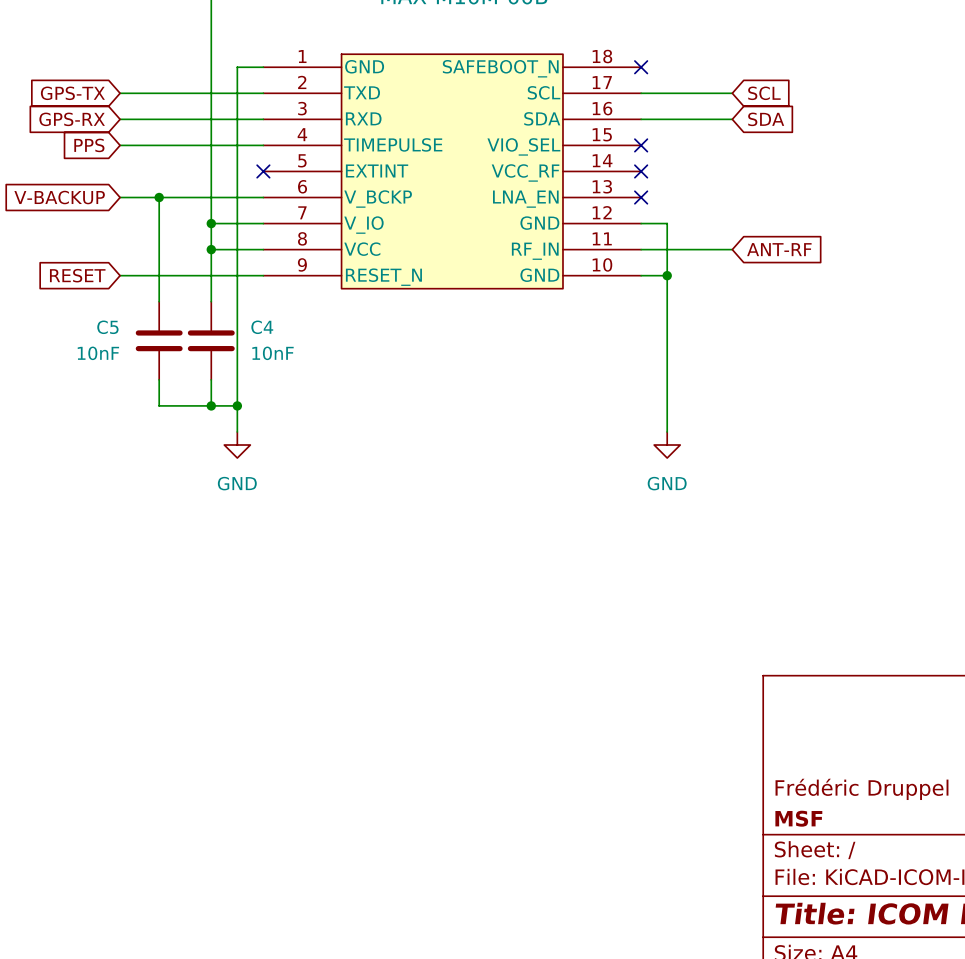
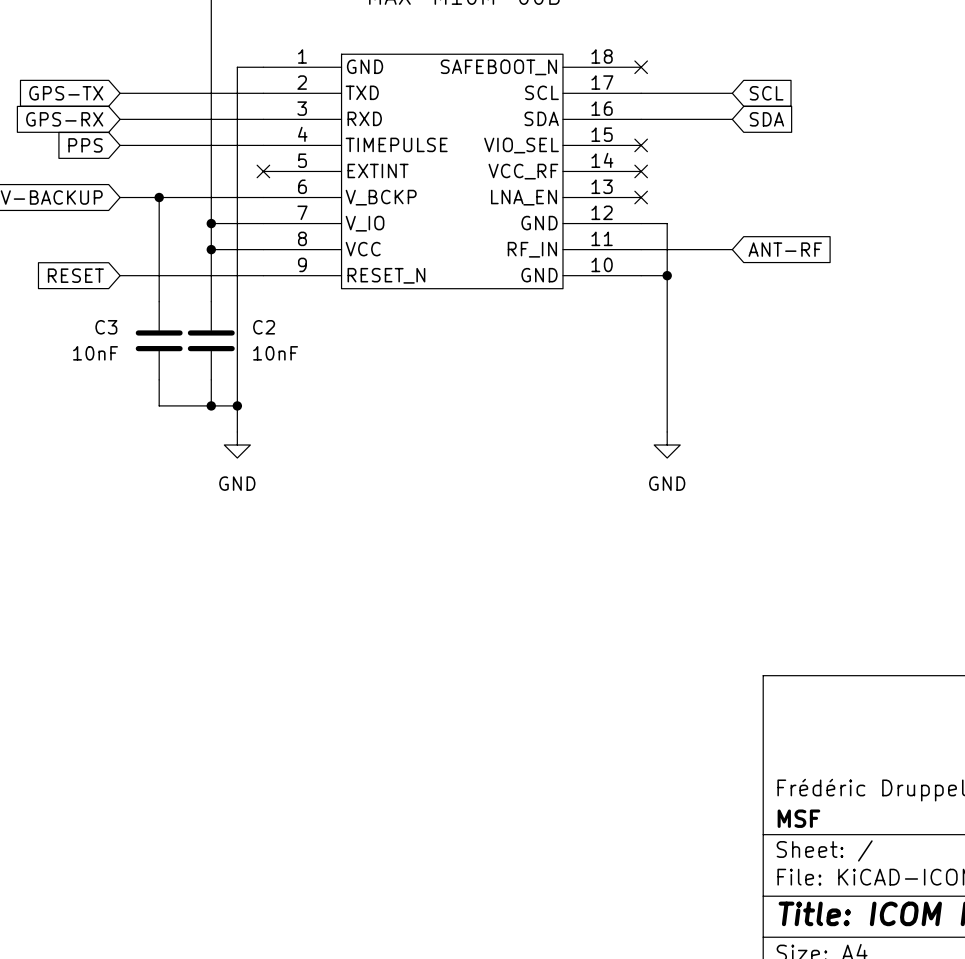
C5 name: C5 (107, 327) -> C3 (106, 327)
C4 name: C4 (262, 327) -> C2 (264, 327)

